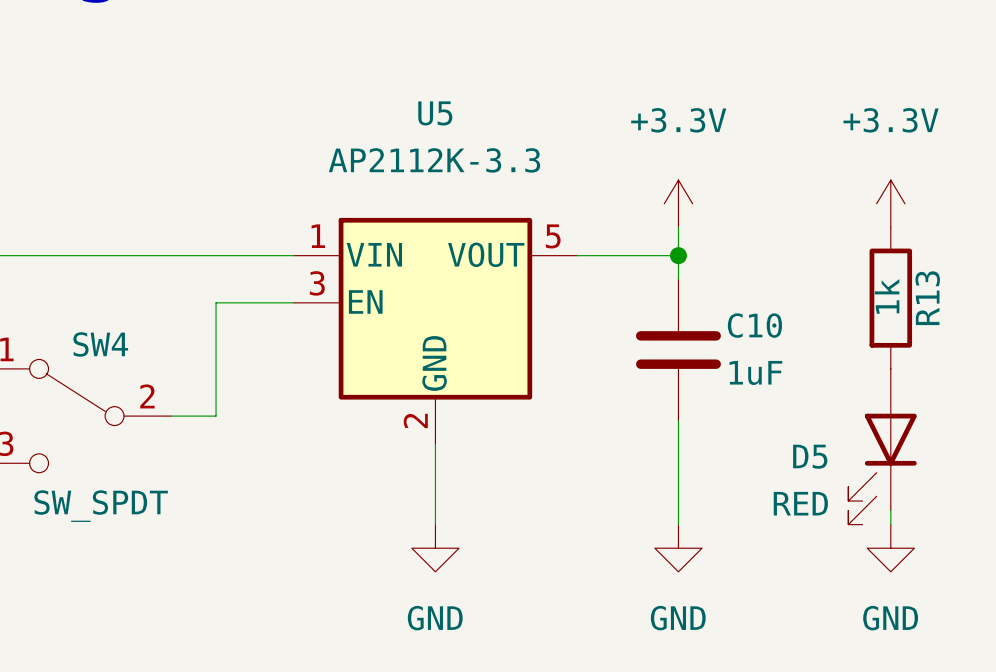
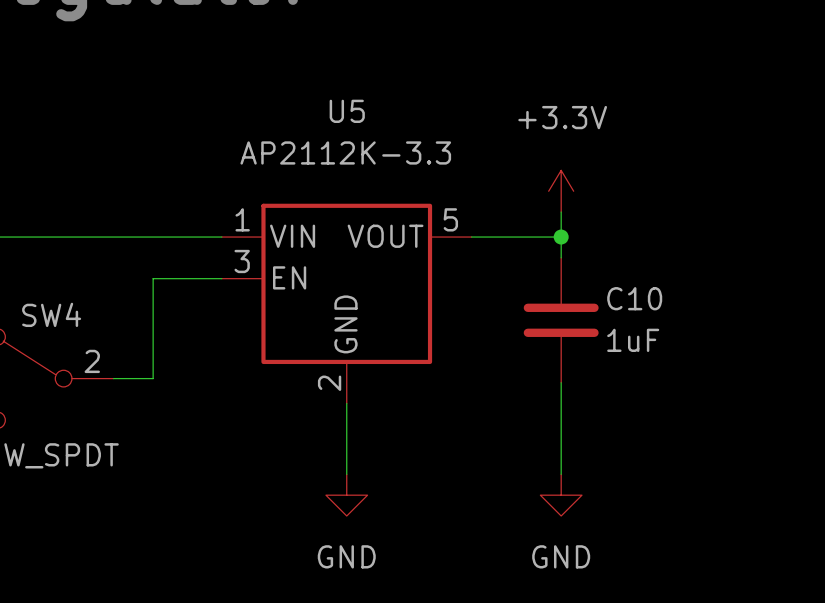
power symbol: +3.3V (890, 203) -> none
R13: 1k (890, 298) -> none
D5: RED (882, 446) -> none
wire: (890, 510) (890, 524) -> none
power symbol: GND (890, 548) -> none

